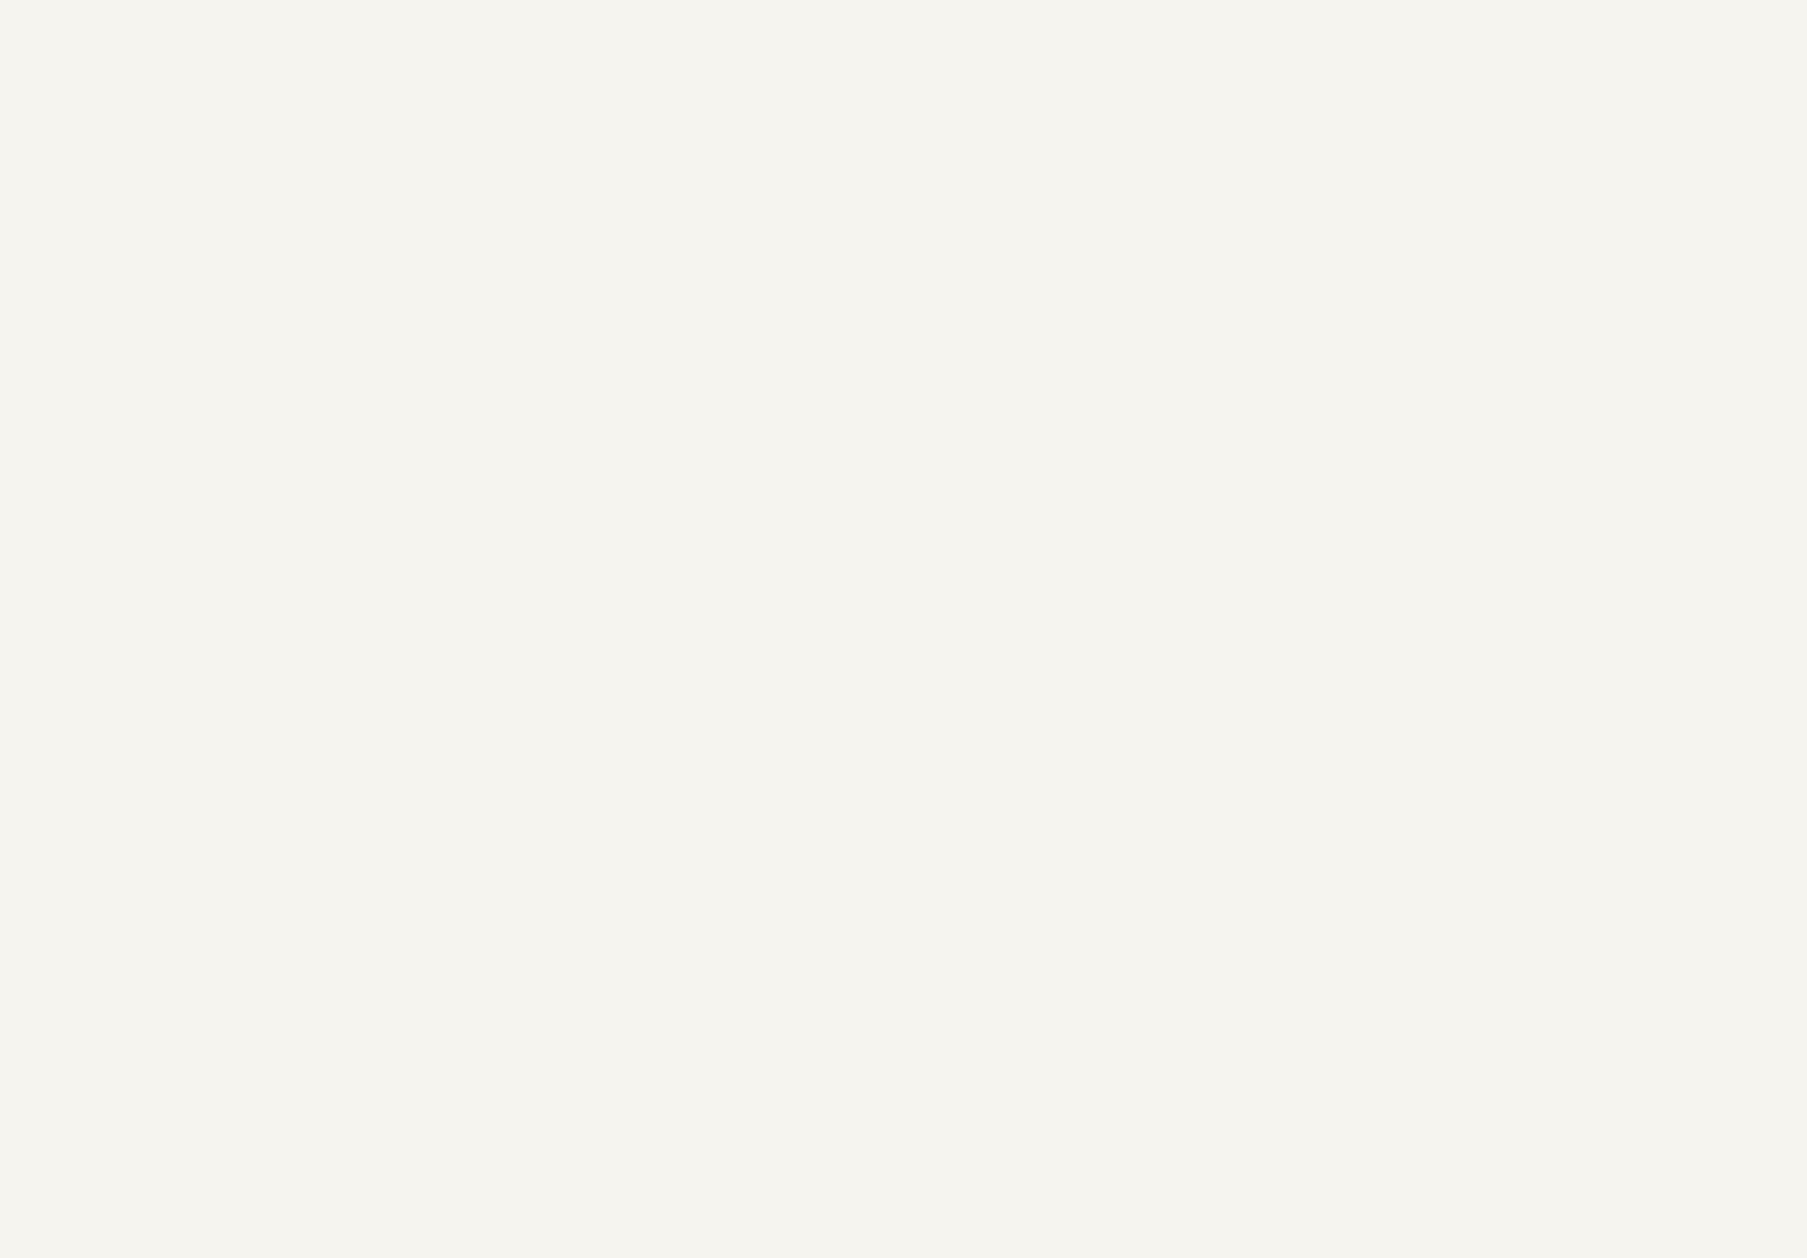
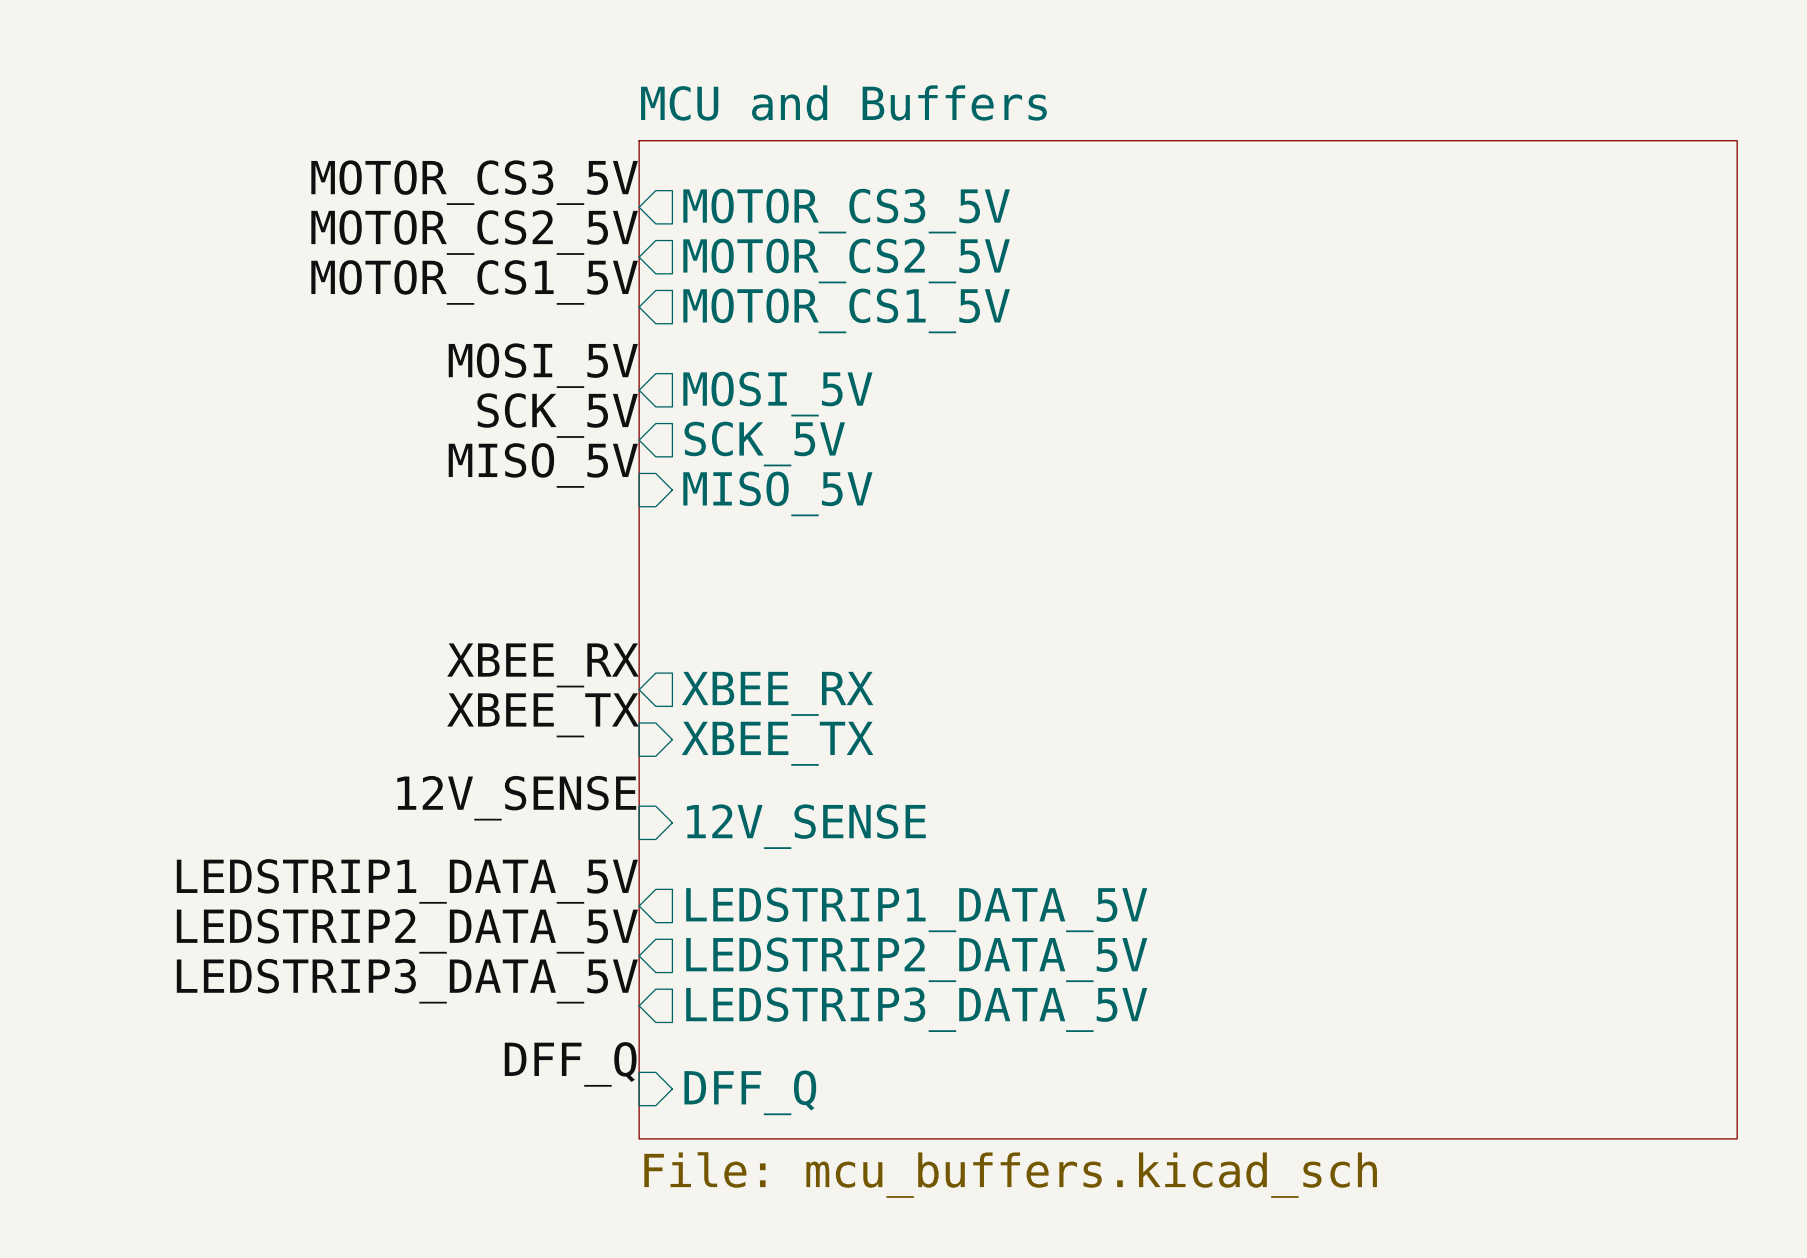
label: none -> MOTOR_CS3_5V (474, 182)
sheet pin: none -> MOTOR_CS3_5V (846, 211)
label: none -> MOTOR_CS2_5V (474, 232)
sheet pin: none -> MOTOR_CS2_5V (846, 261)
label: none -> MOTOR_CS1_5V (474, 282)
sheet pin: none -> MOTOR_CS1_5V (846, 310)
label: none -> MOSI_5V (543, 365)
sheet pin: none -> MOSI_5V (777, 394)
label: none -> SCK_5V (557, 415)
sheet pin: none -> SCK_5V (764, 444)
label: none -> MISO_5V (543, 465)
sheet pin: none -> MISO_5V (777, 493)
sheet MCU and Buffers: none -> File: mcu_buffers.kicad_sch (1188, 639)
label: none -> XBEE_RX (542, 665)
sheet pin: none -> XBEE_RX (777, 693)
label: none -> XBEE_TX (542, 715)
sheet pin: none -> XBEE_TX (777, 743)
label: none -> 12V_SENSE (516, 798)
sheet pin: none -> 12V_SENSE (806, 826)
label: none -> LEDSTRIP1_DATA_5V (407, 881)
sheet pin: none -> LEDSTRIP1_DATA_5V (916, 909)
label: none -> LEDSTRIP2_DATA_5V (407, 931)
sheet pin: none -> LEDSTRIP2_DATA_5V (916, 959)
label: none -> LEDSTRIP3_DATA_5V (407, 981)
sheet pin: none -> LEDSTRIP3_DATA_5V (916, 1009)
label: none -> DFF_Q (570, 1064)
sheet pin: none -> DFF_Q (750, 1092)

